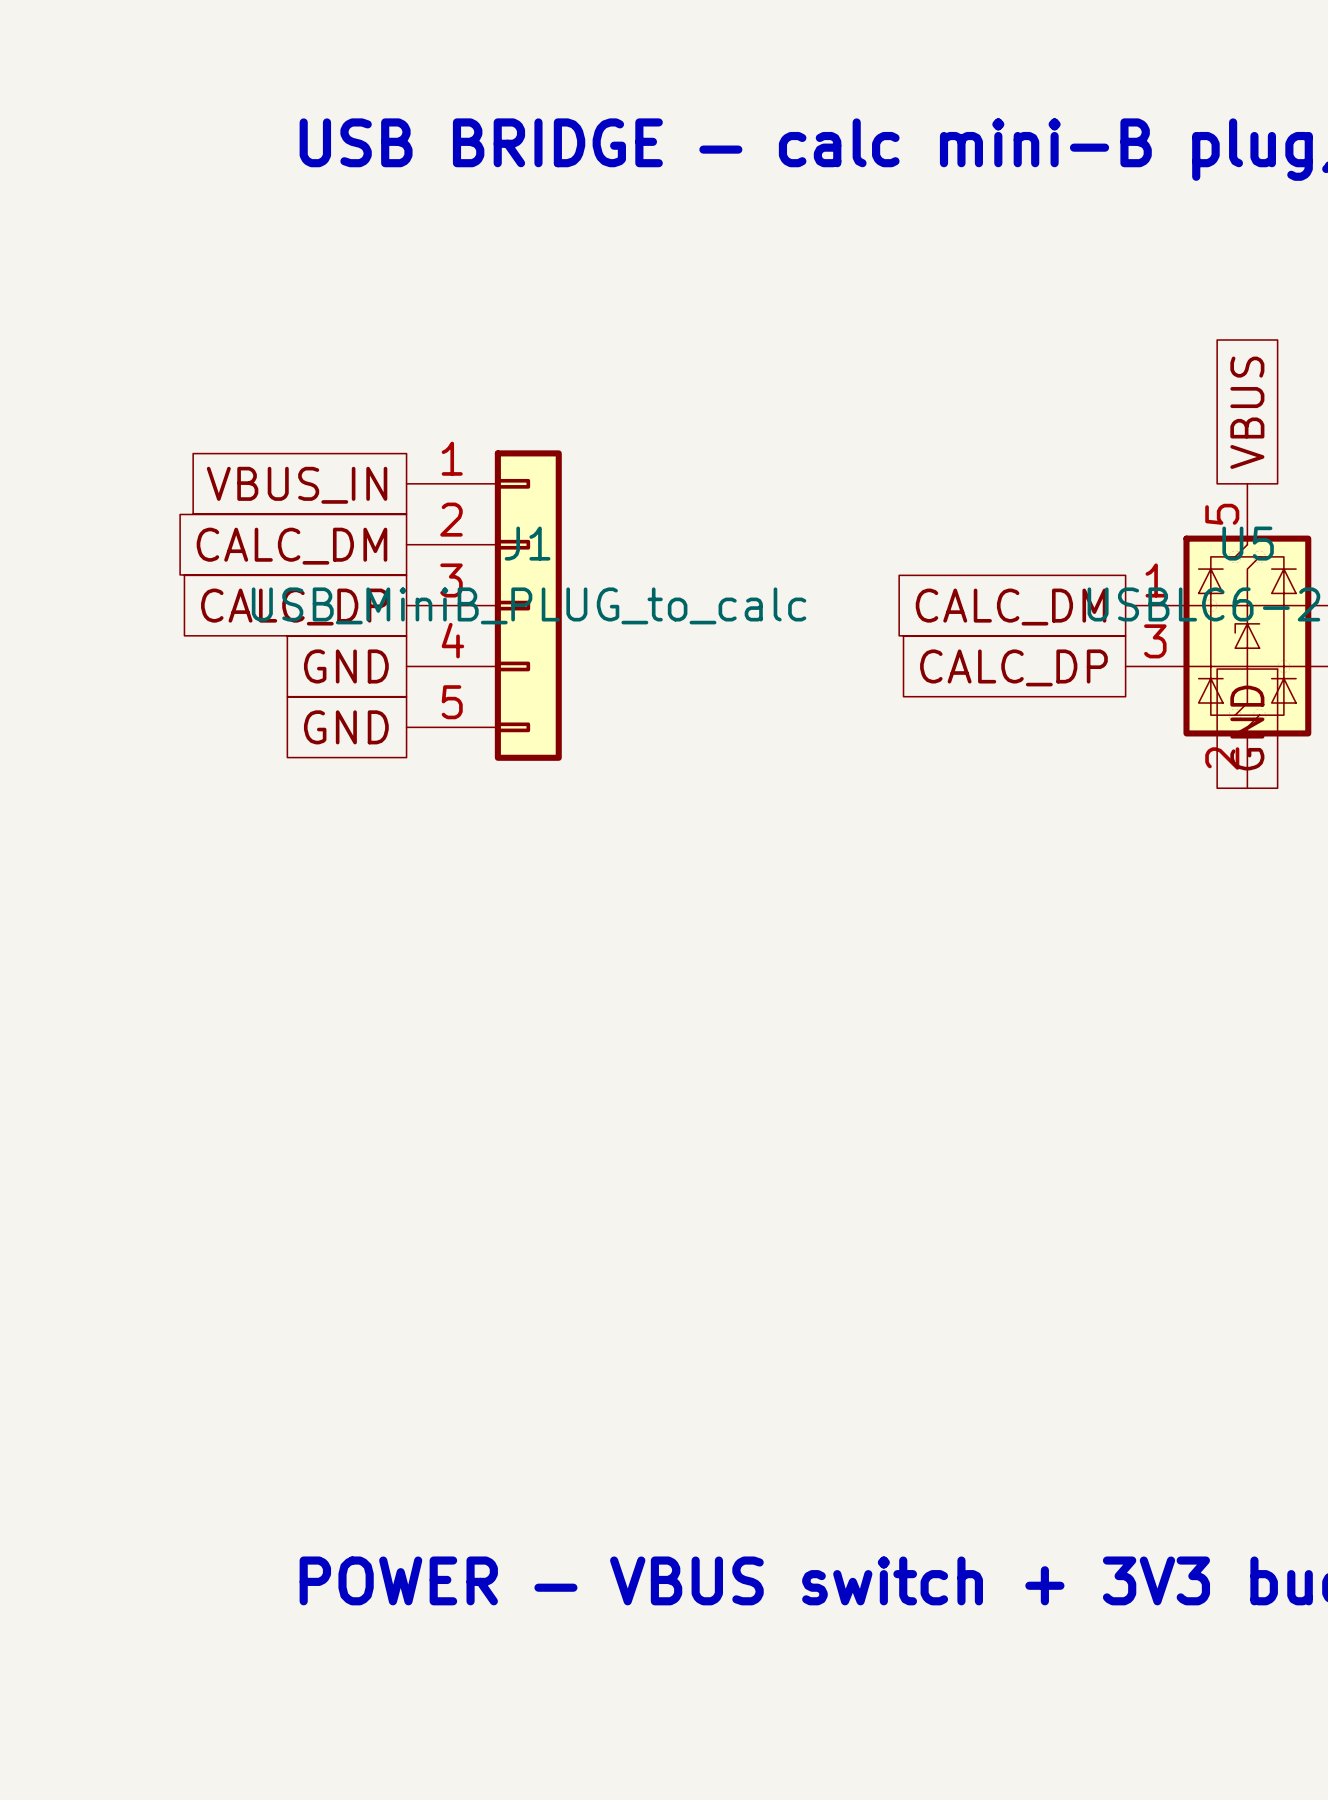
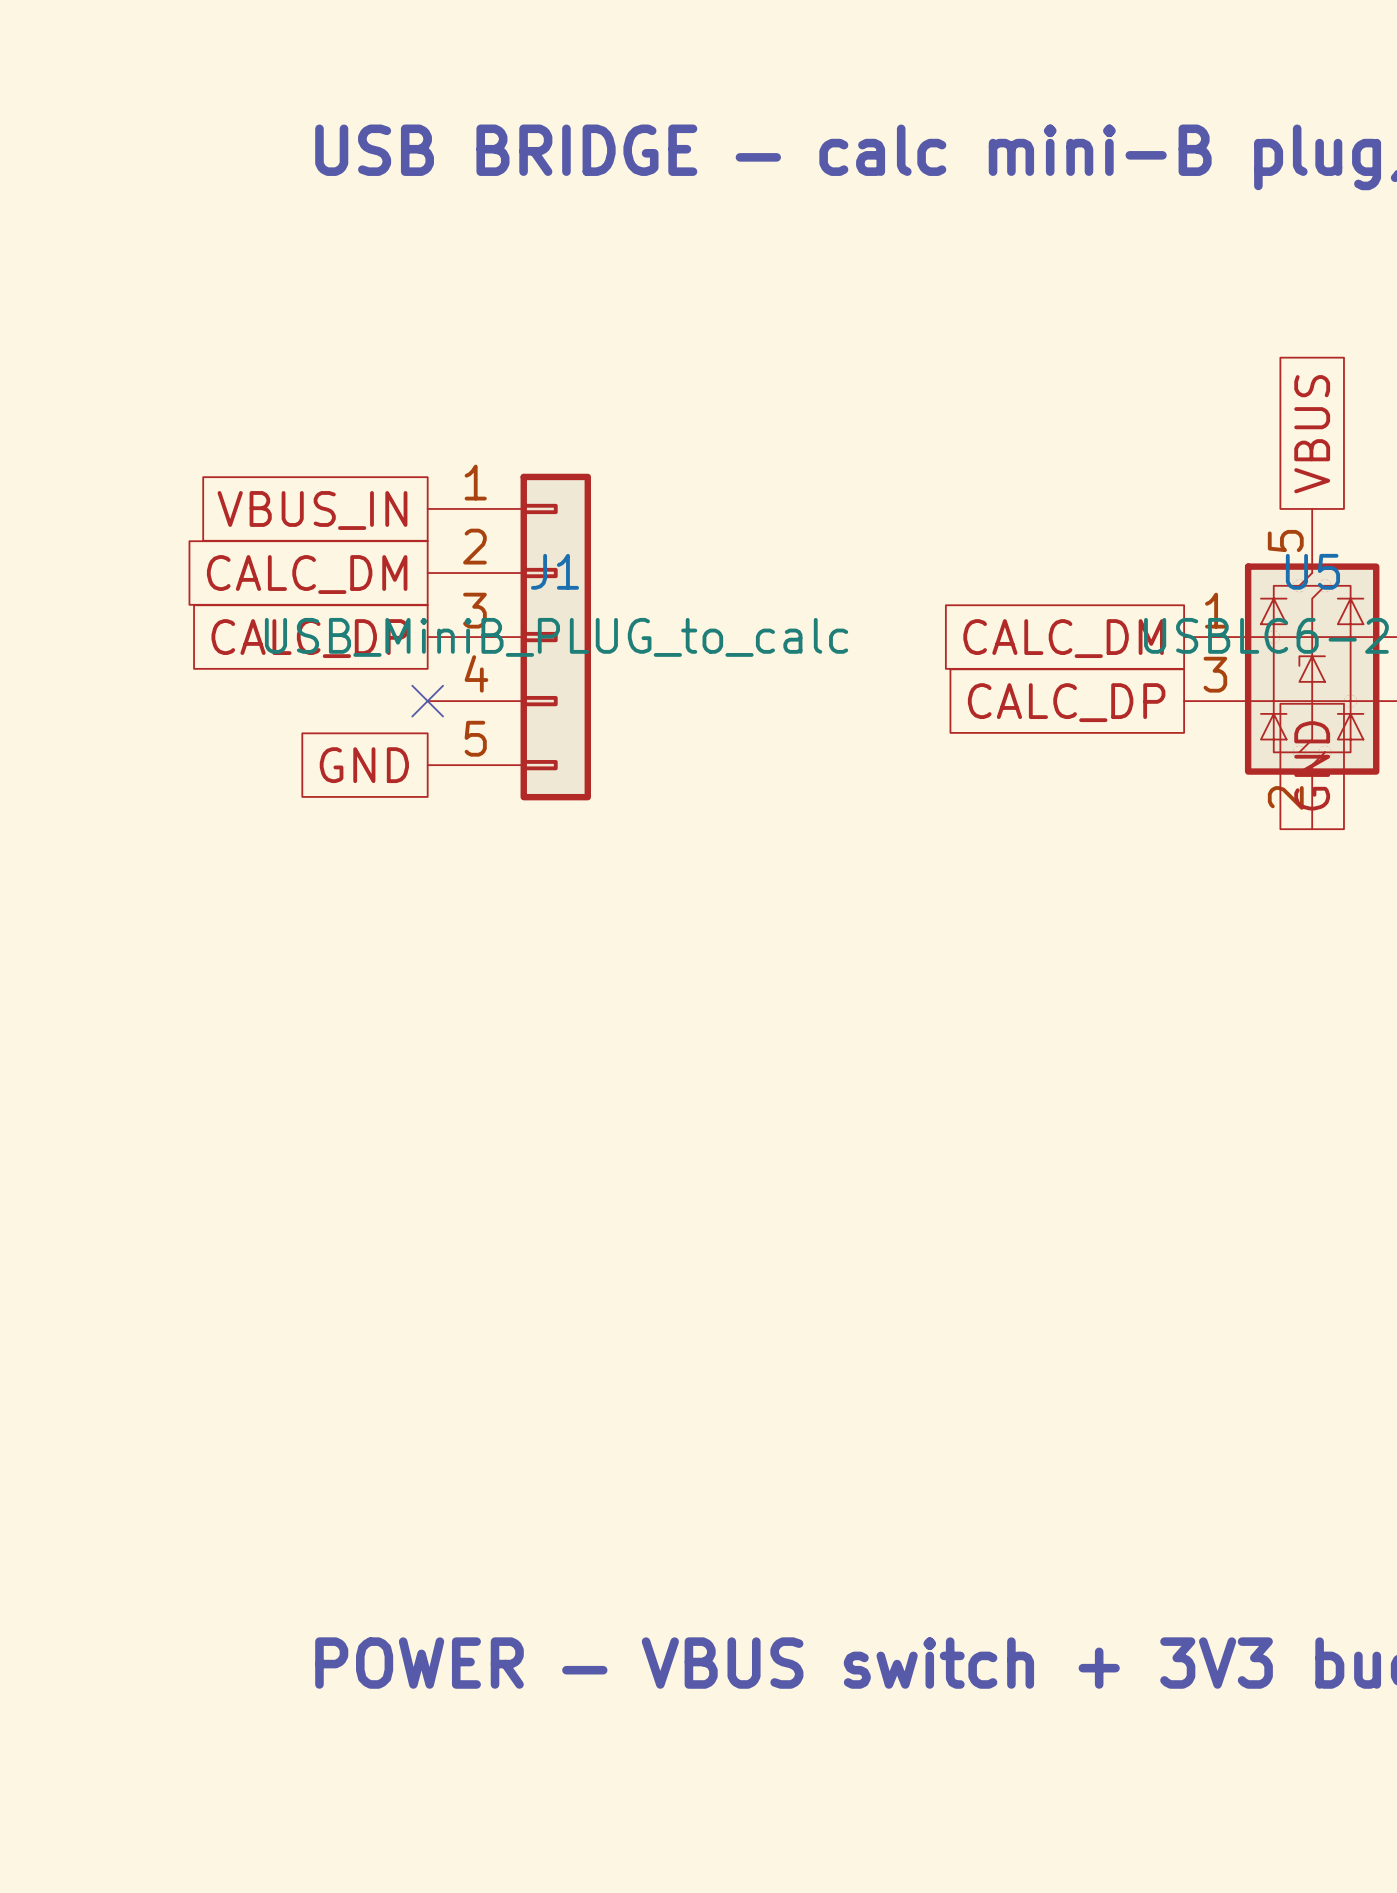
global label: GND (346, 666) -> none
no-connect mark: none -> (427, 701)

